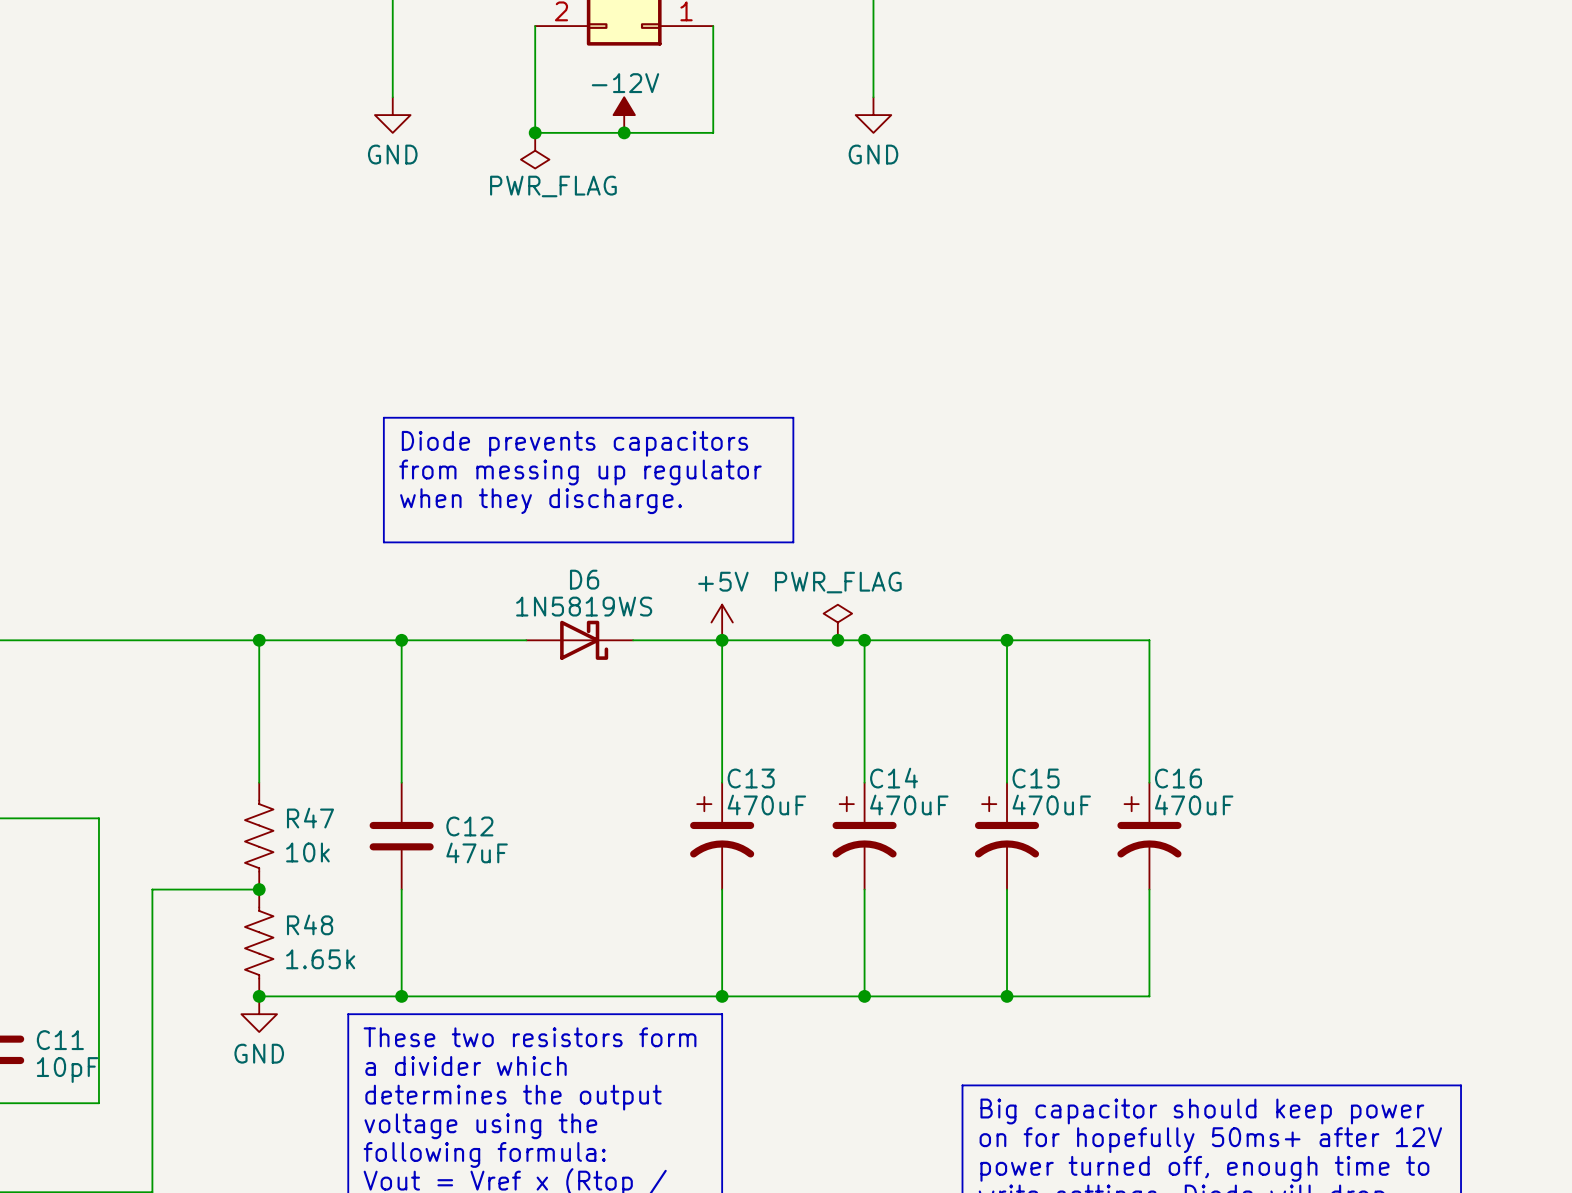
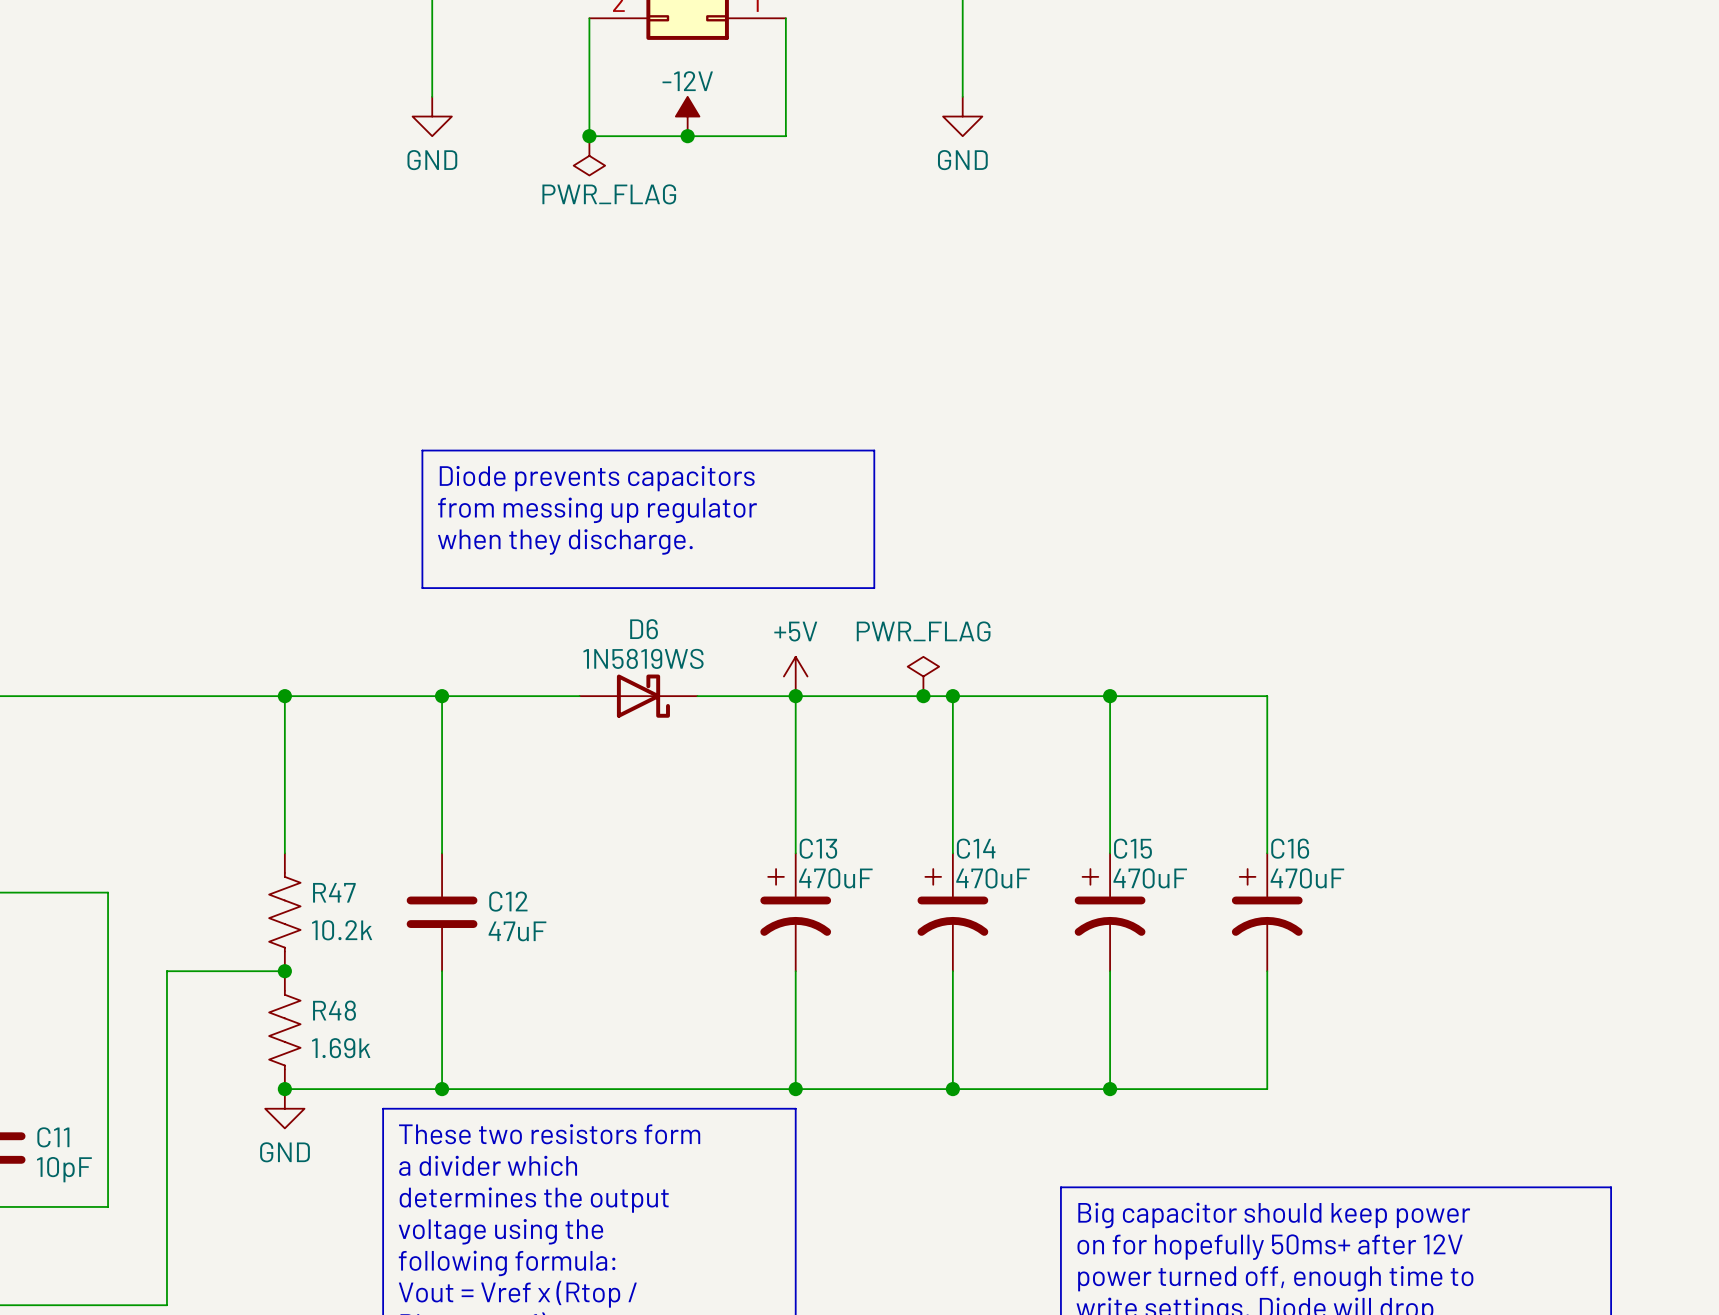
R47 value: 10k (307, 852) -> 10.2k (342, 930)
R48 value: 1.65k (320, 959) -> 1.69k (341, 1048)

